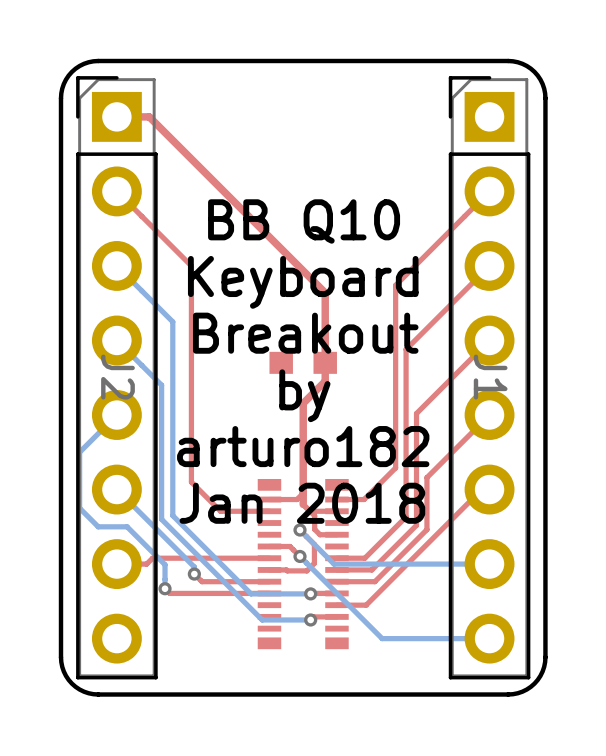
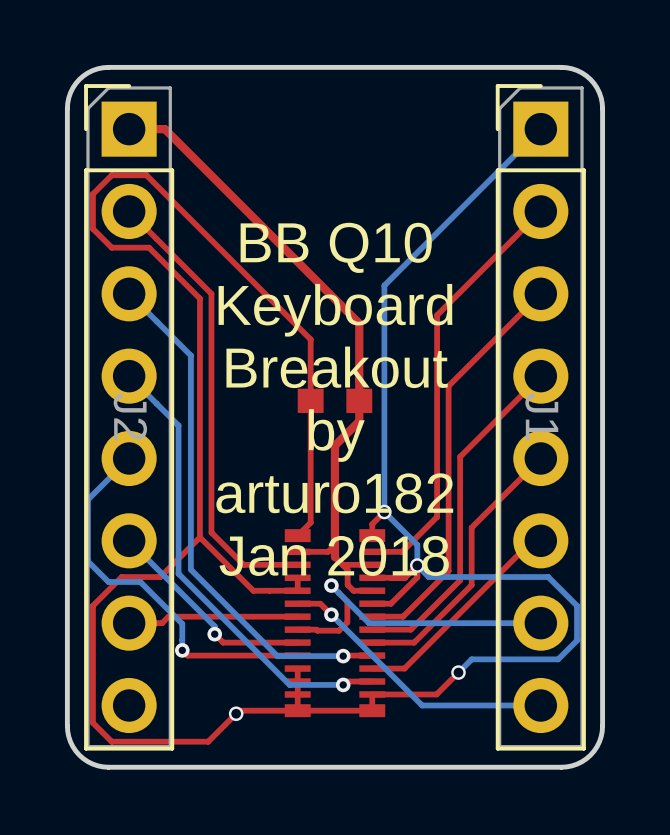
bottom track: none -> (540, 129) (384, 285) (384, 512) (417, 544) (417, 565) (428, 577) (548, 577) (577, 605) (577, 640) (558, 659) (471, 659) (458, 672)
top track: none -> (384, 512) (372, 524) (372, 535)
via: none -> (384, 512)
top track: none -> (297, 535) (310, 522) (310, 339) (146, 175) (111, 175) (92, 194) (92, 228) (111, 247) (149, 247) (199, 298) (199, 537)
top track: none -> (199, 537) (253, 590) (297, 590) (297, 577)
top track: none -> (199, 537) (160, 577) (121, 577) (92, 605) (92, 722) (111, 741) (208, 741) (239, 710) (372, 710) (372, 694) (436, 694) (458, 672)
via: none -> (417, 565)
top track: none -> (372, 577) (405, 577) (417, 565) (417, 577) (390, 603) (372, 603)
top track: none -> (297, 668) (297, 710)
via: none -> (458, 672)
via: none -> (236, 713)

